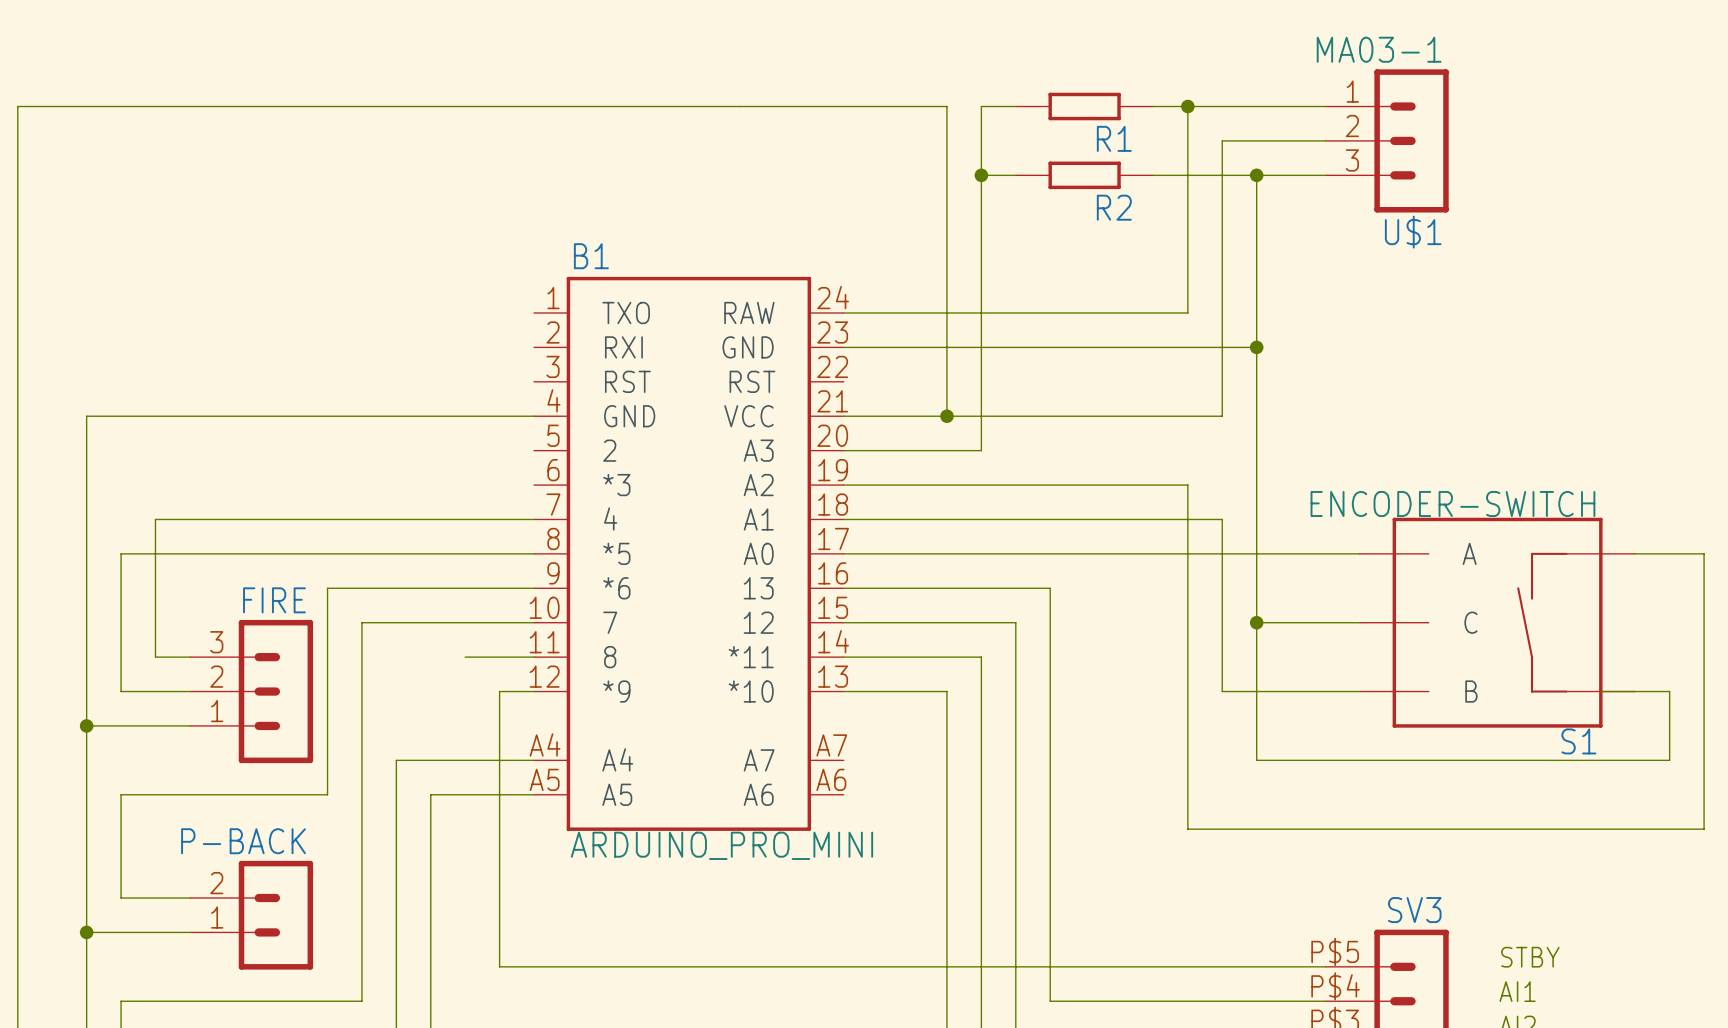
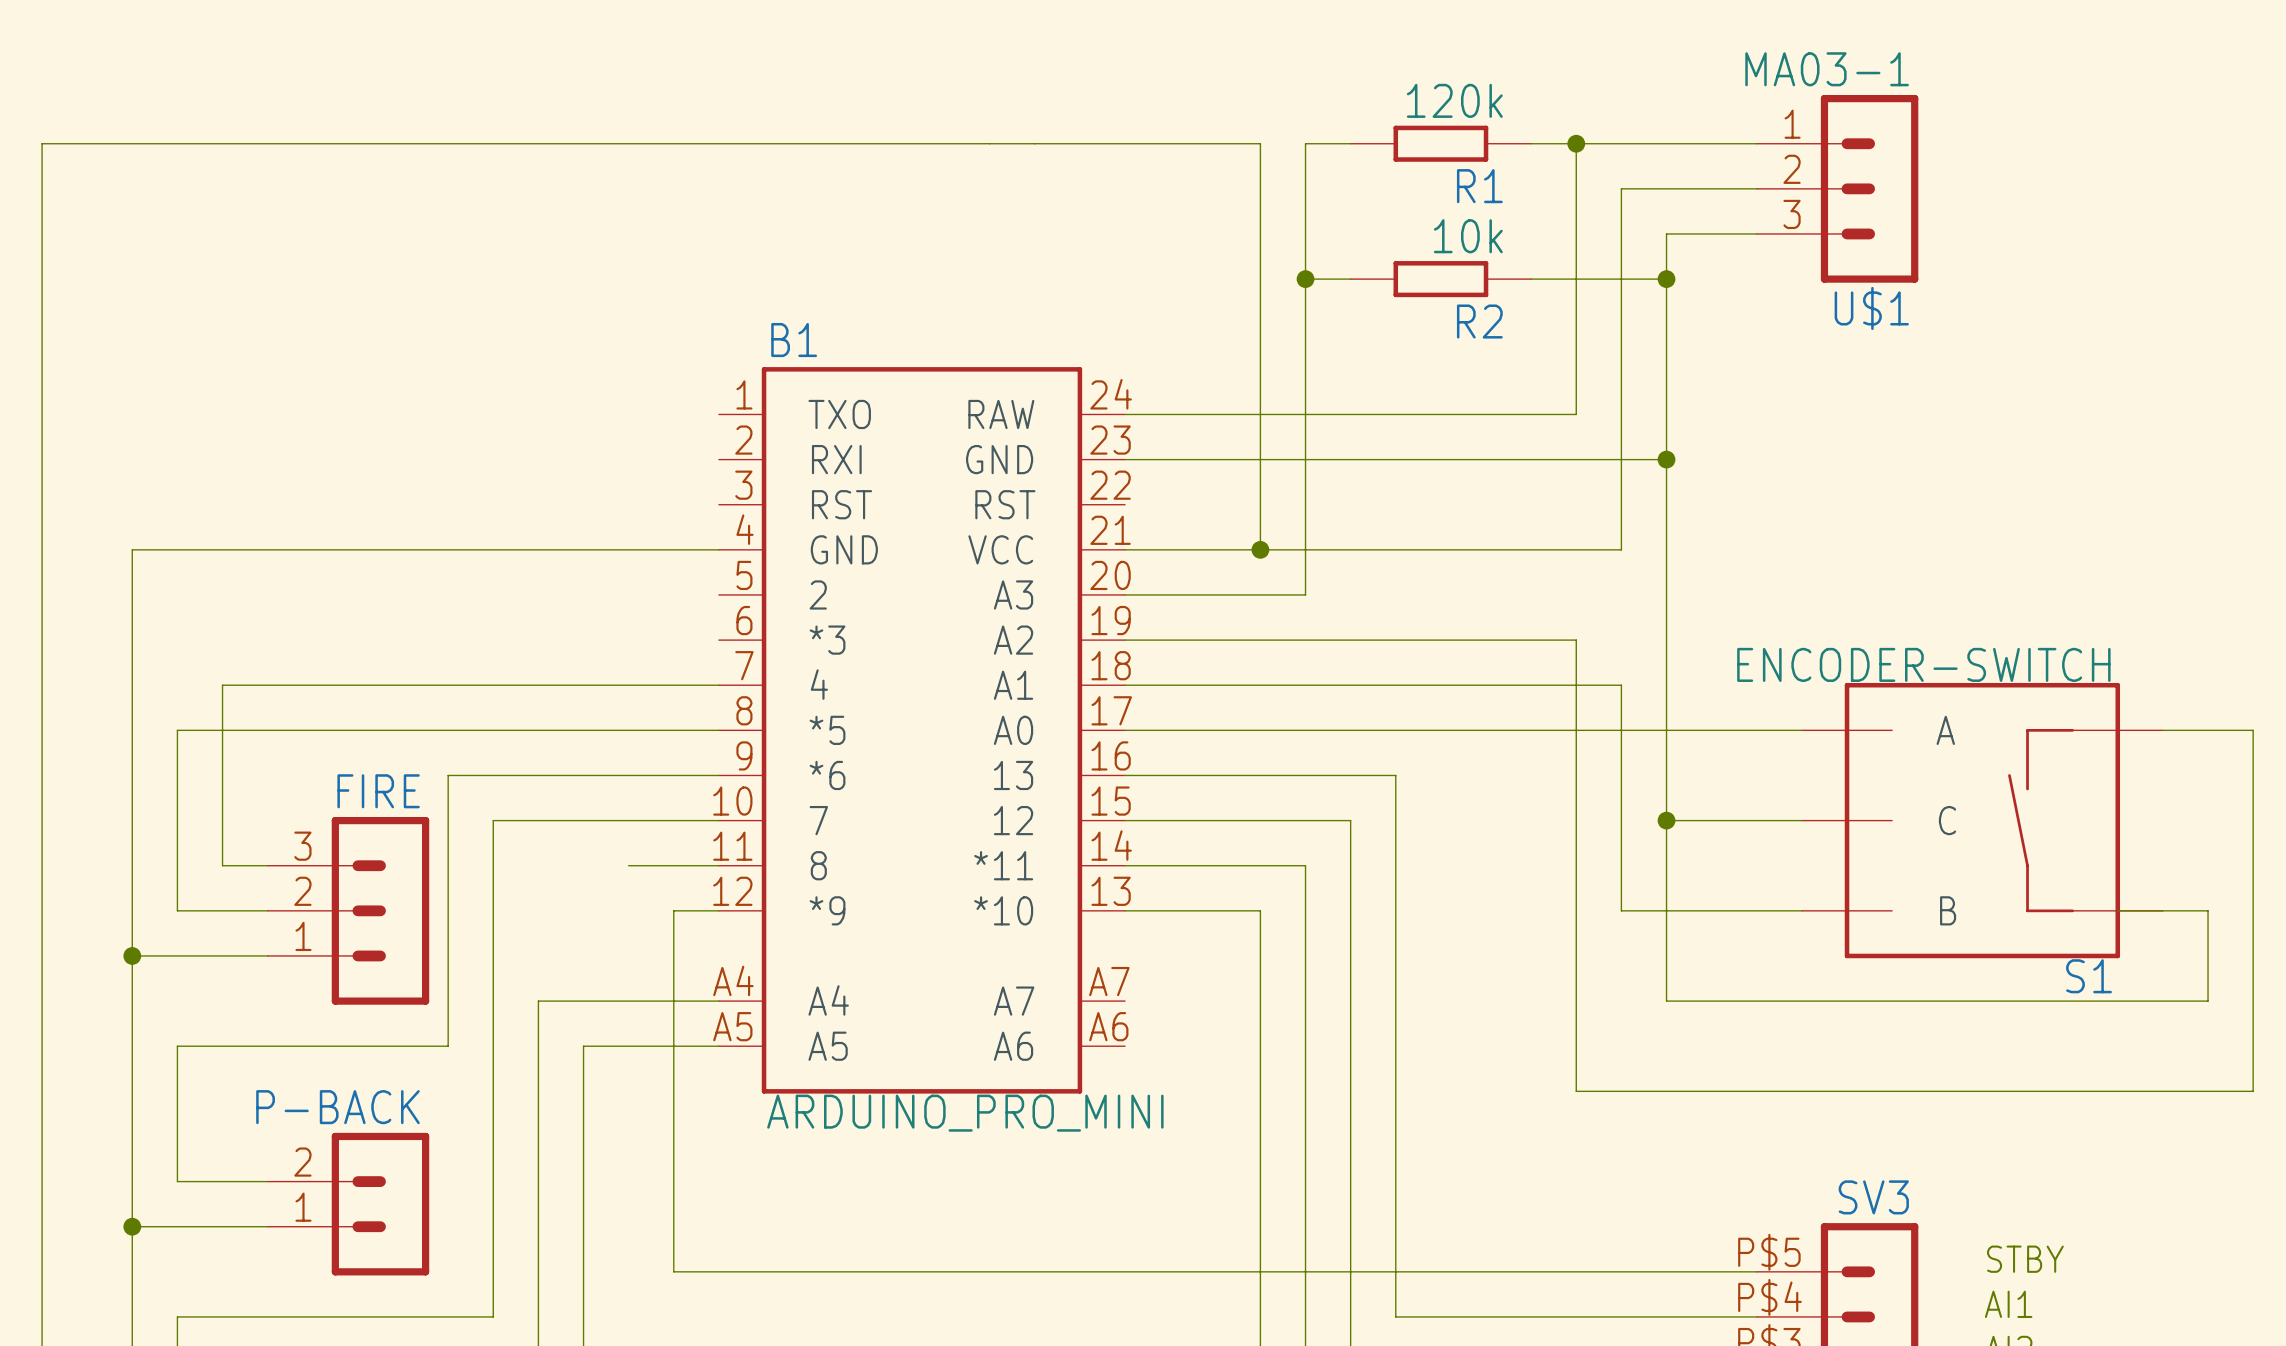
R1 value: none -> 120k (1454, 100)
wire: (981, 175) (1015, 175) -> (1305, 279) (1350, 279)
junction position: (981, 175) -> (1305, 279)
R2 position: (1084, 175) -> (1440, 279)
wire: (1153, 175) (1256, 175) -> (1531, 279) (1666, 279)
junction position: (1256, 175) -> (1666, 279)
R2 value: none -> 10k (1468, 236)

